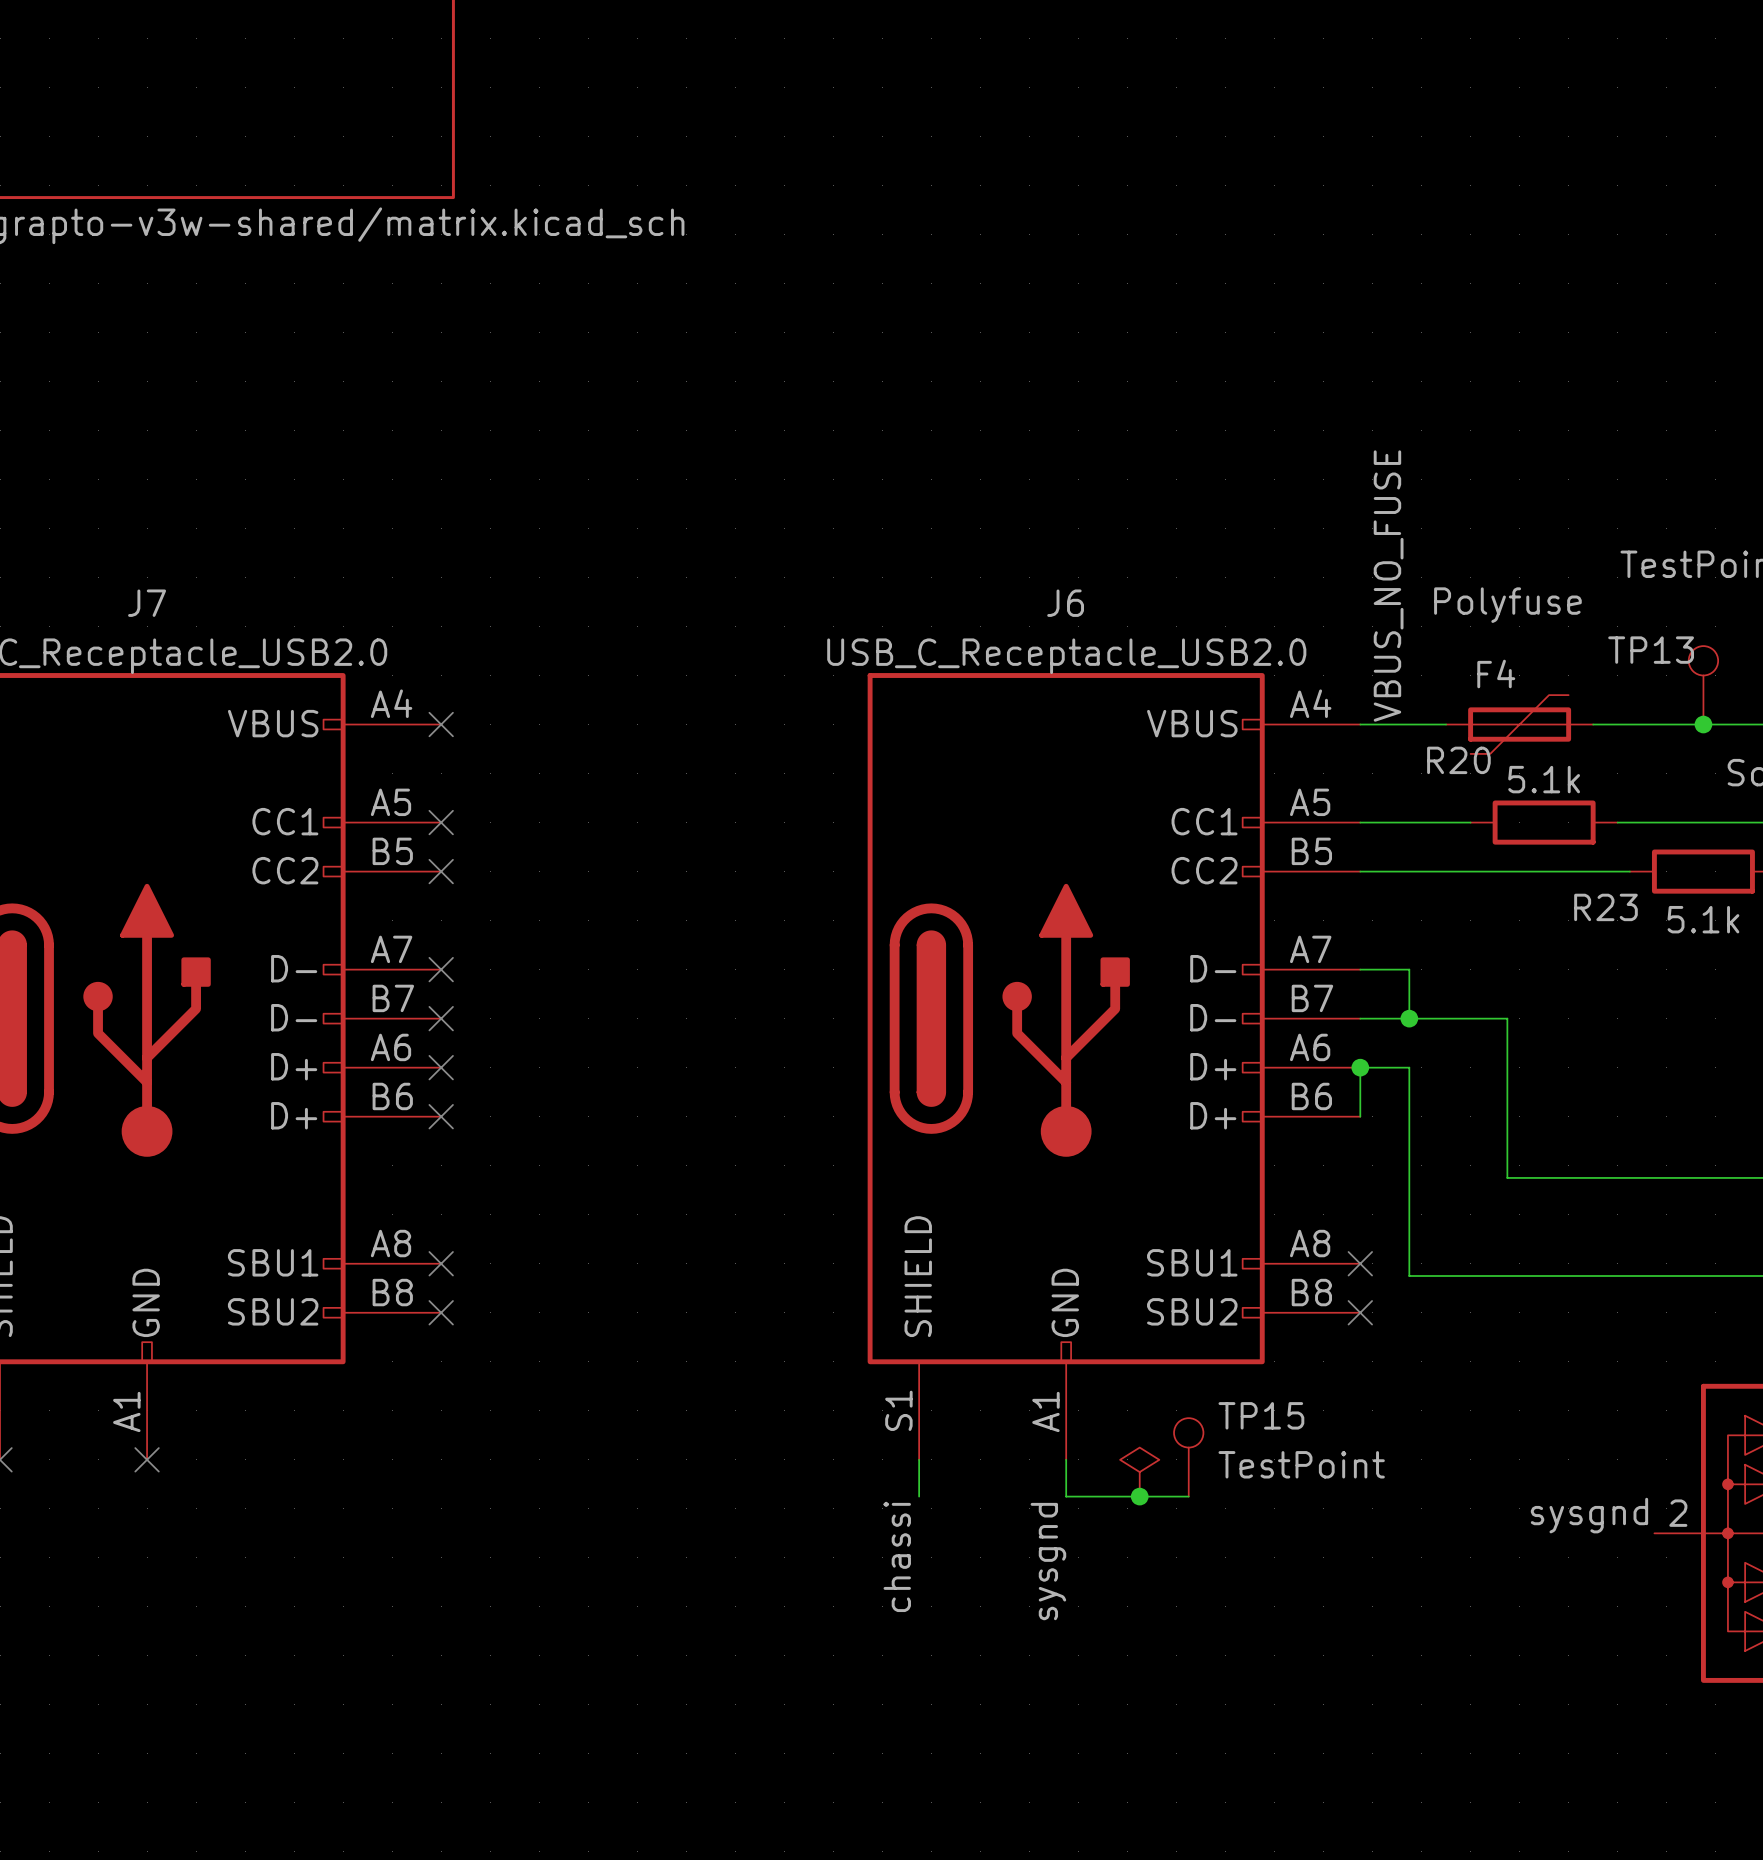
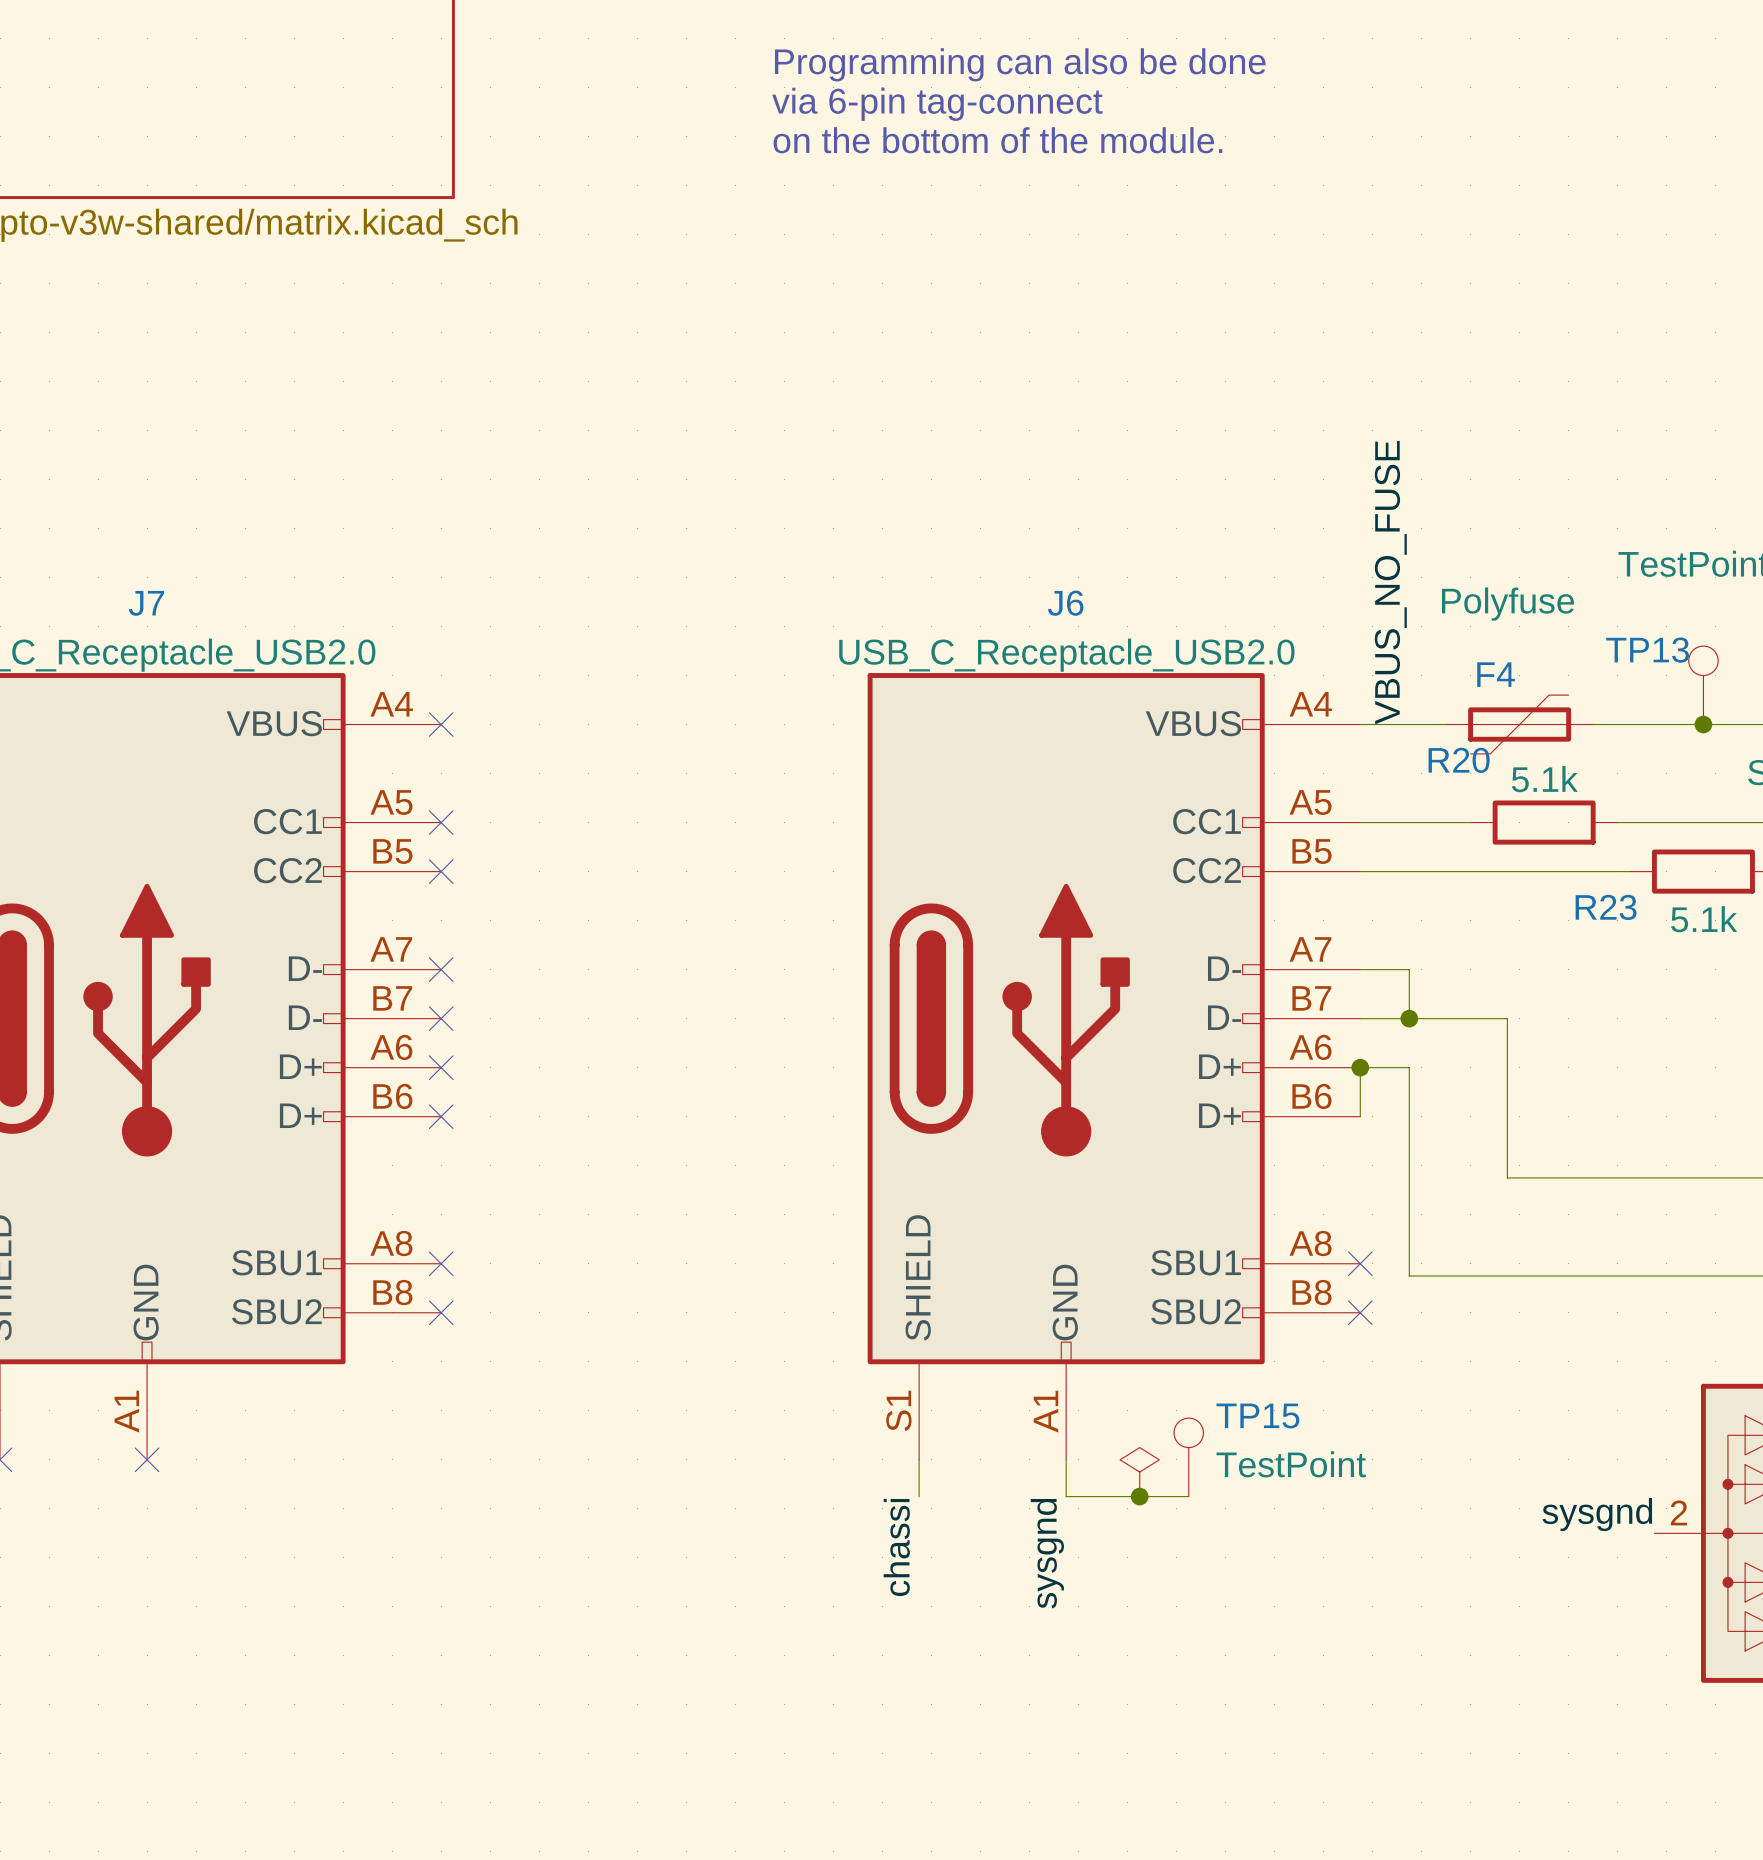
text: none -> Programming can also be done (1020, 64)
text: none -> via 6-pin tag-connect (937, 104)
text: none -> on the bottom of the module. (997, 140)

